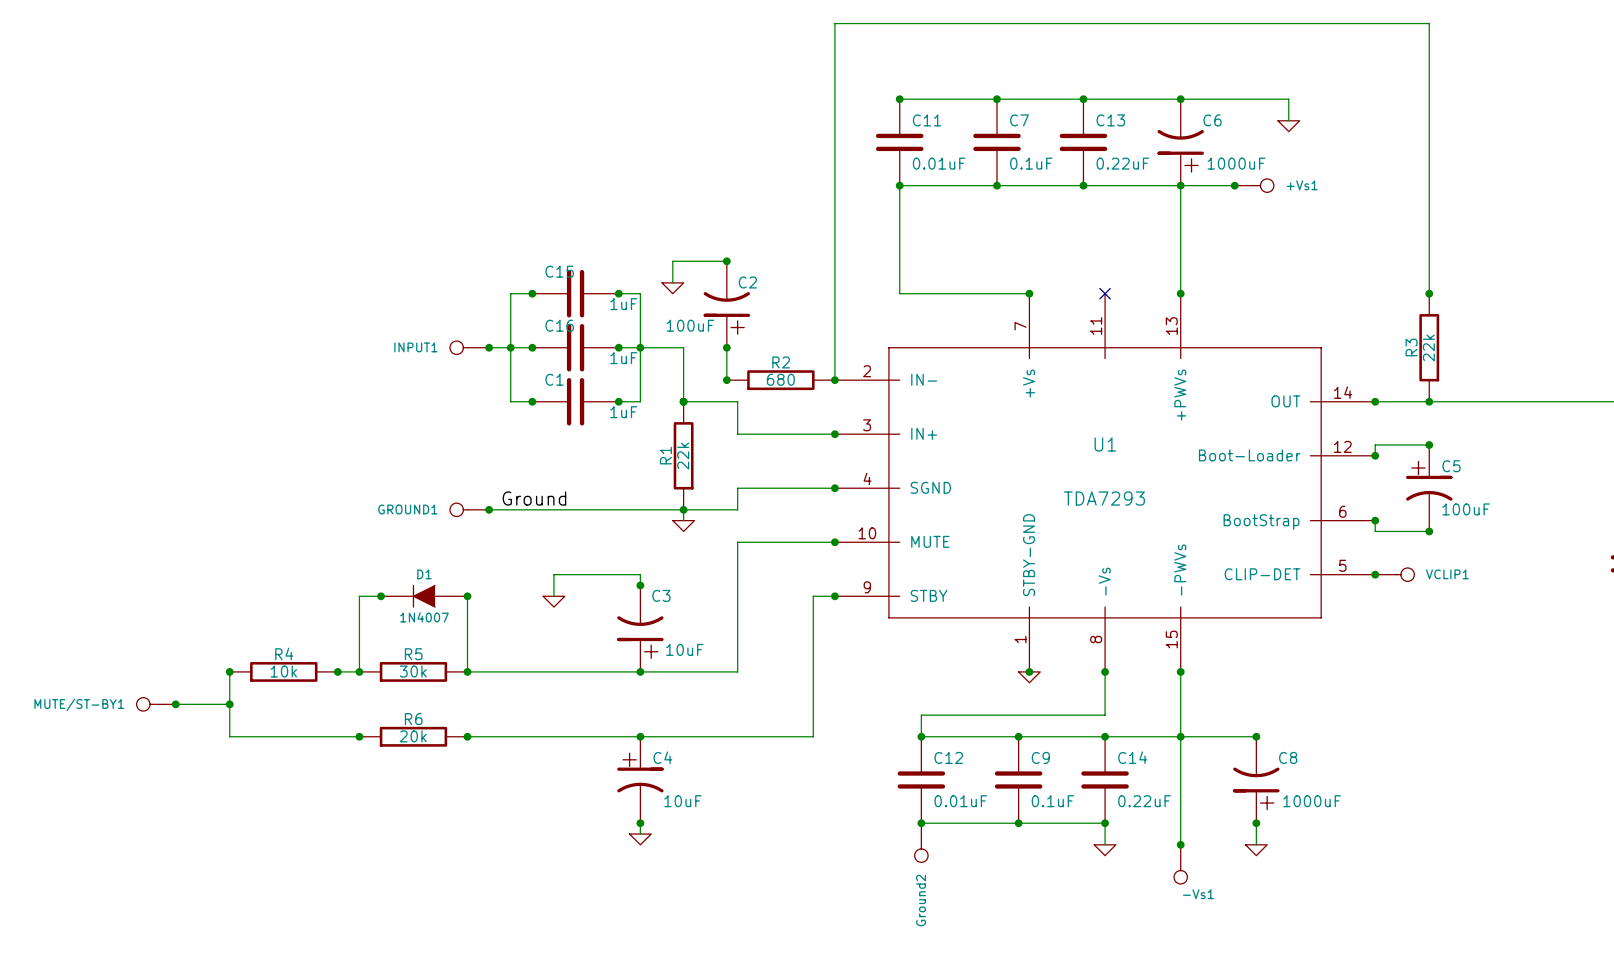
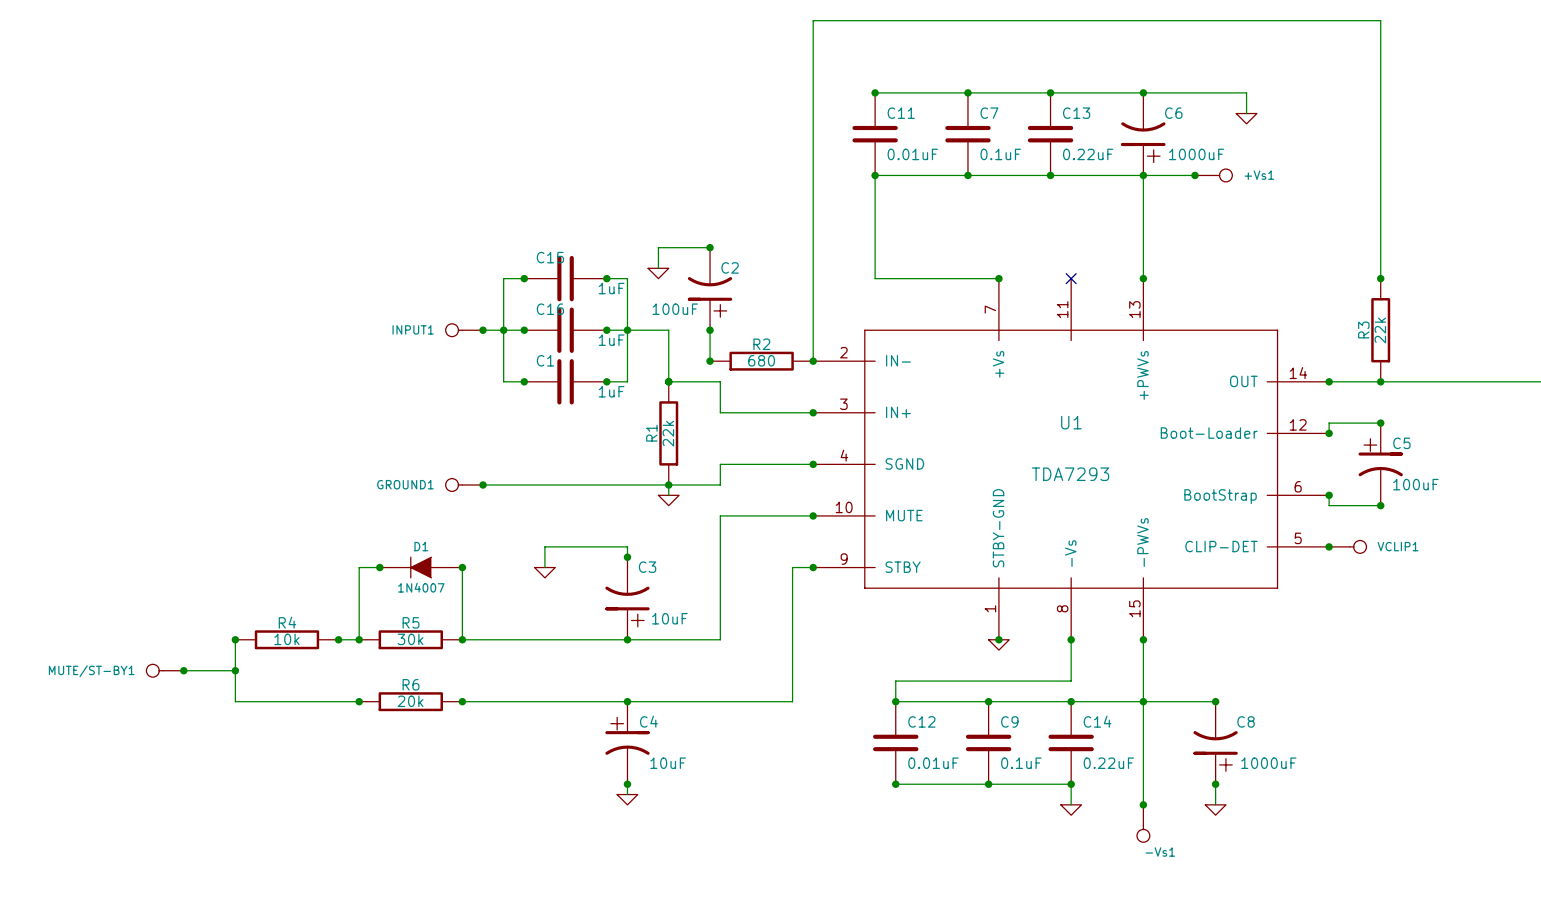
label: Ground (534, 498) -> none
Ground2: (921, 842) -> none

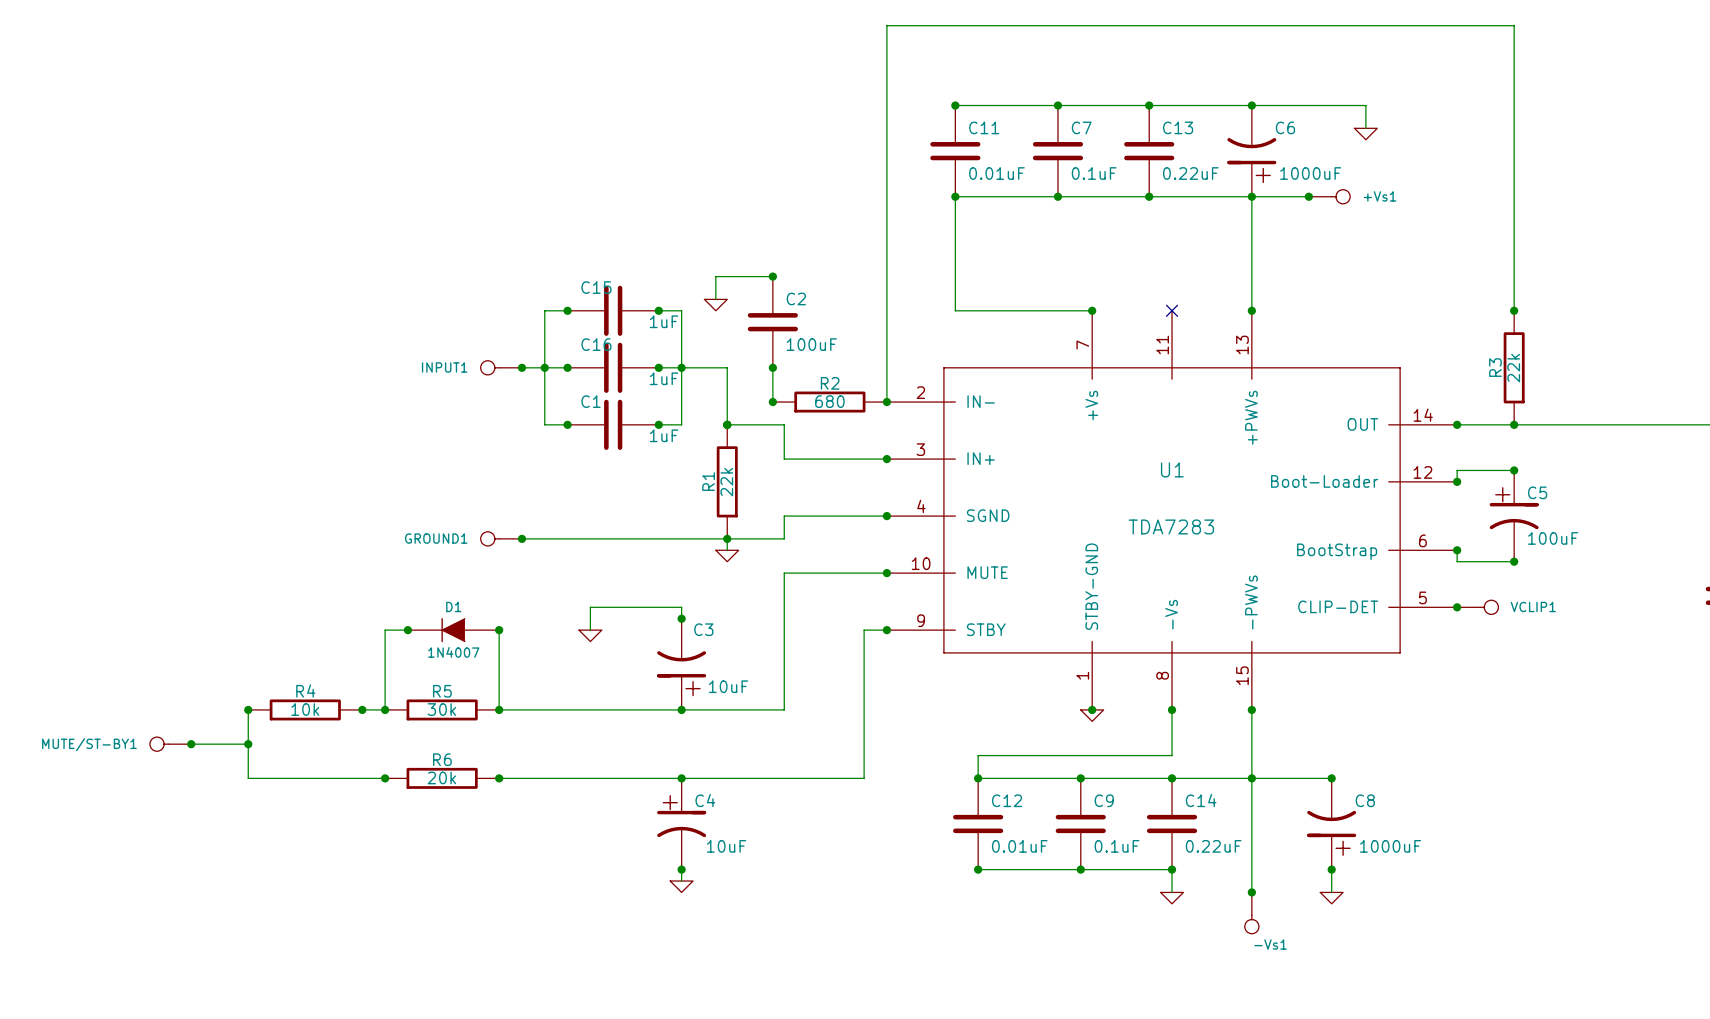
C2 symbol: [687, 247, 733, 331] -> [747, 276, 798, 368]
C2 value position: 100uF (675, 309) -> 100uF (811, 344)
U1 value: TDA7293 (1070, 474) -> TDA7283 (1171, 526)

